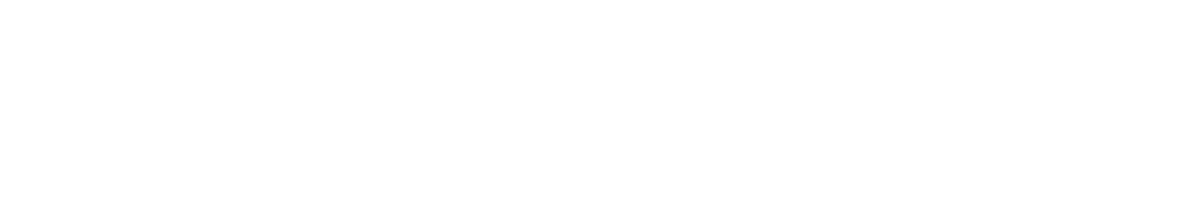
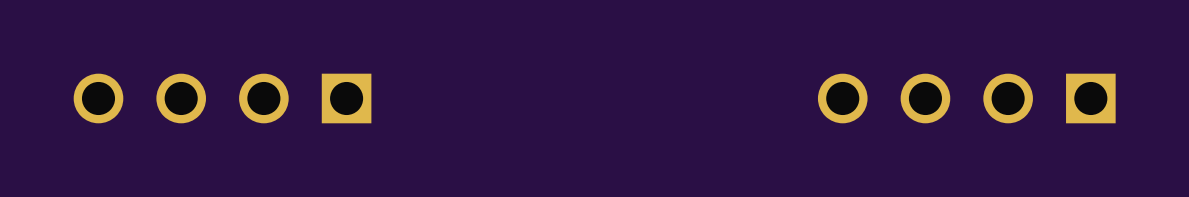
part: none -> (222, 98)
part: none -> (966, 98)

